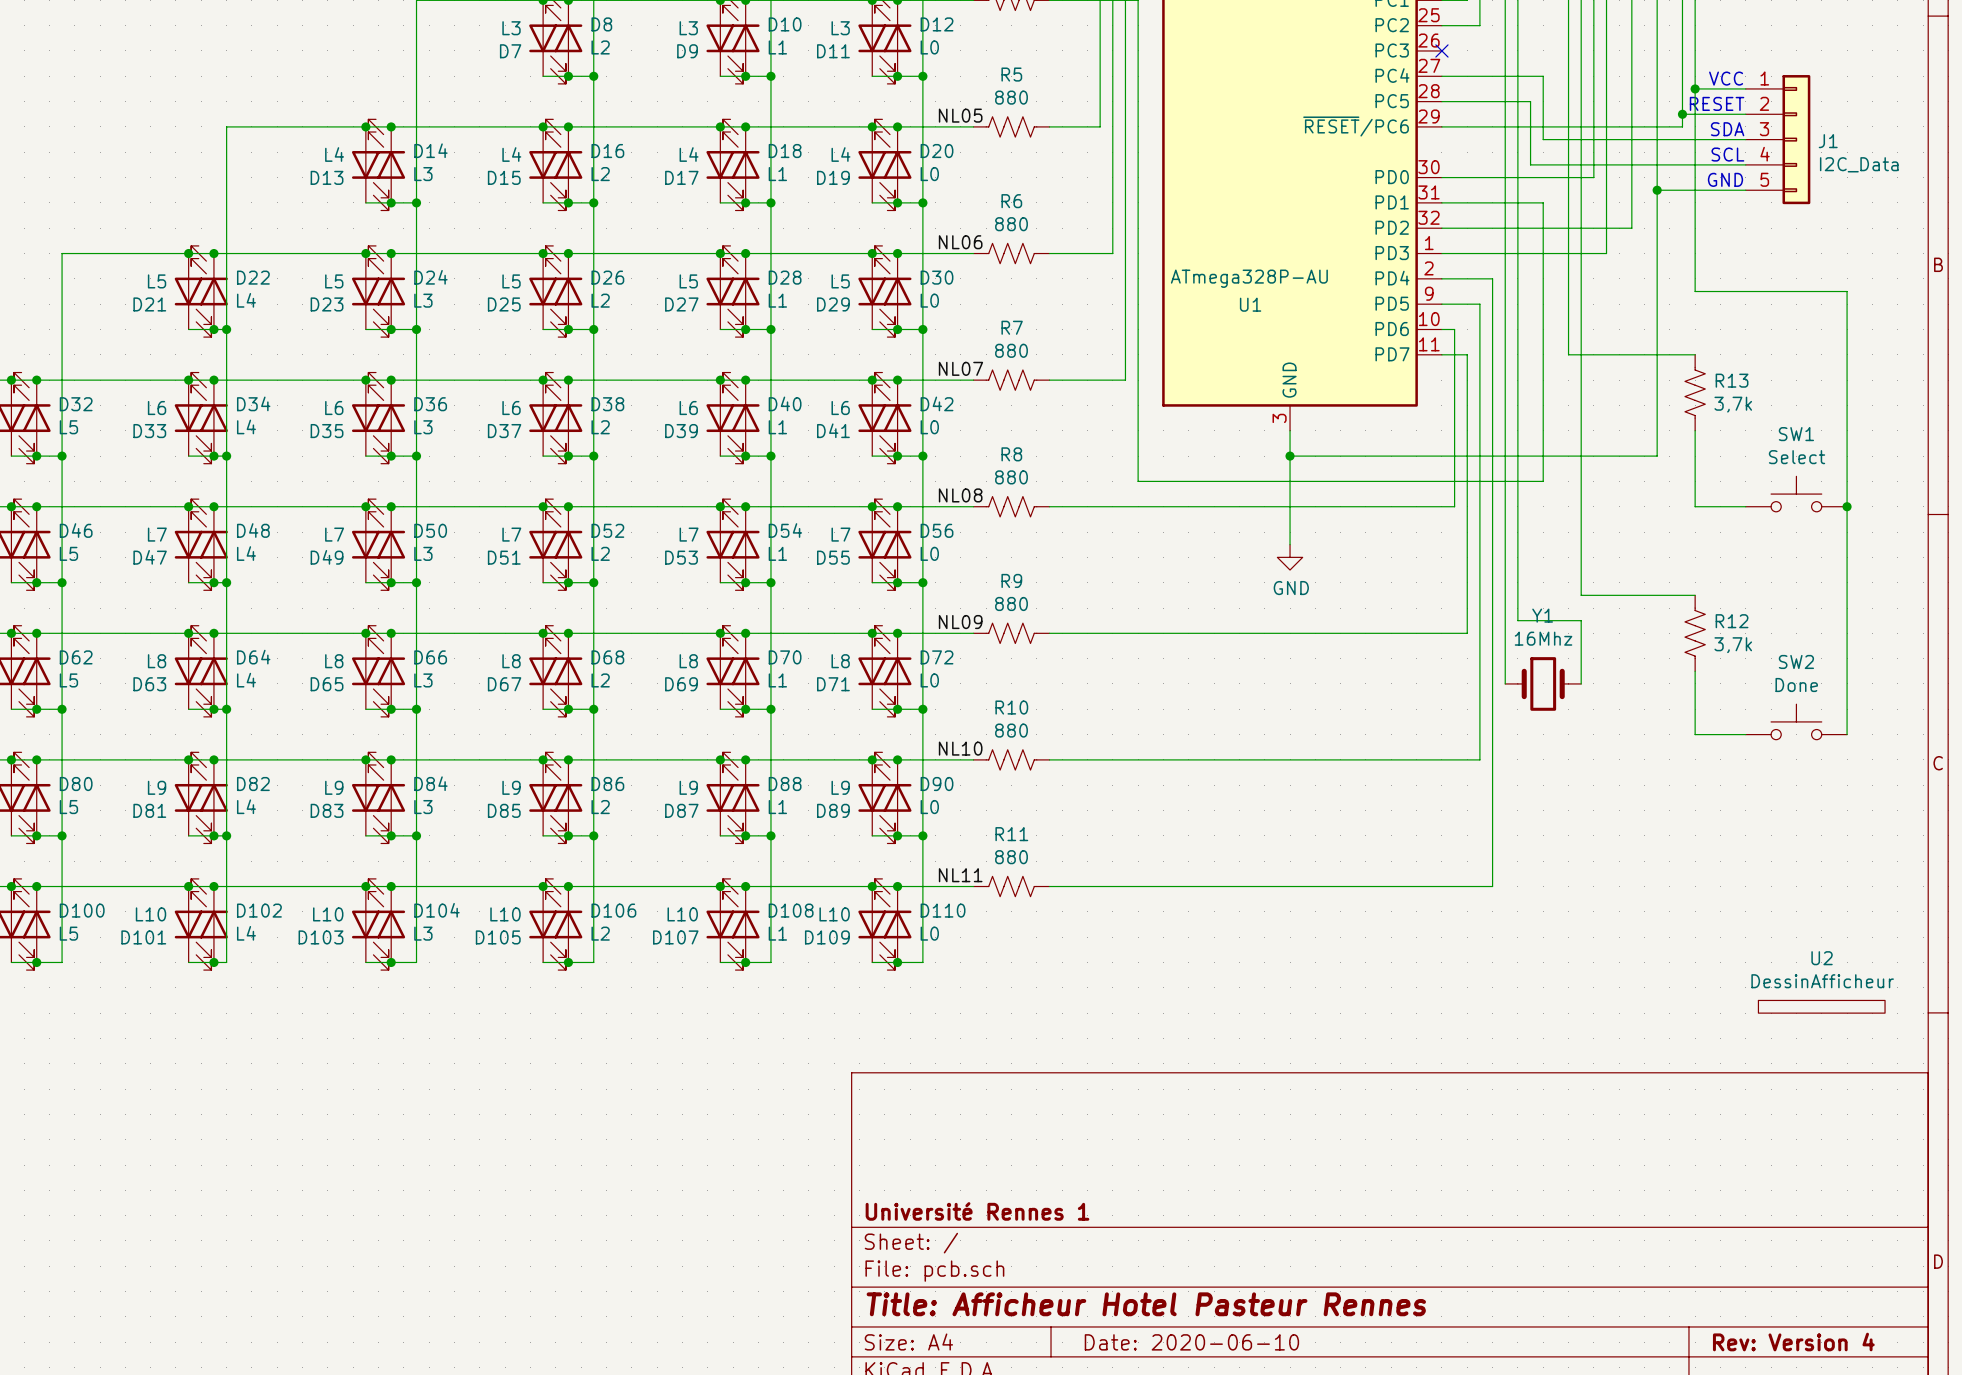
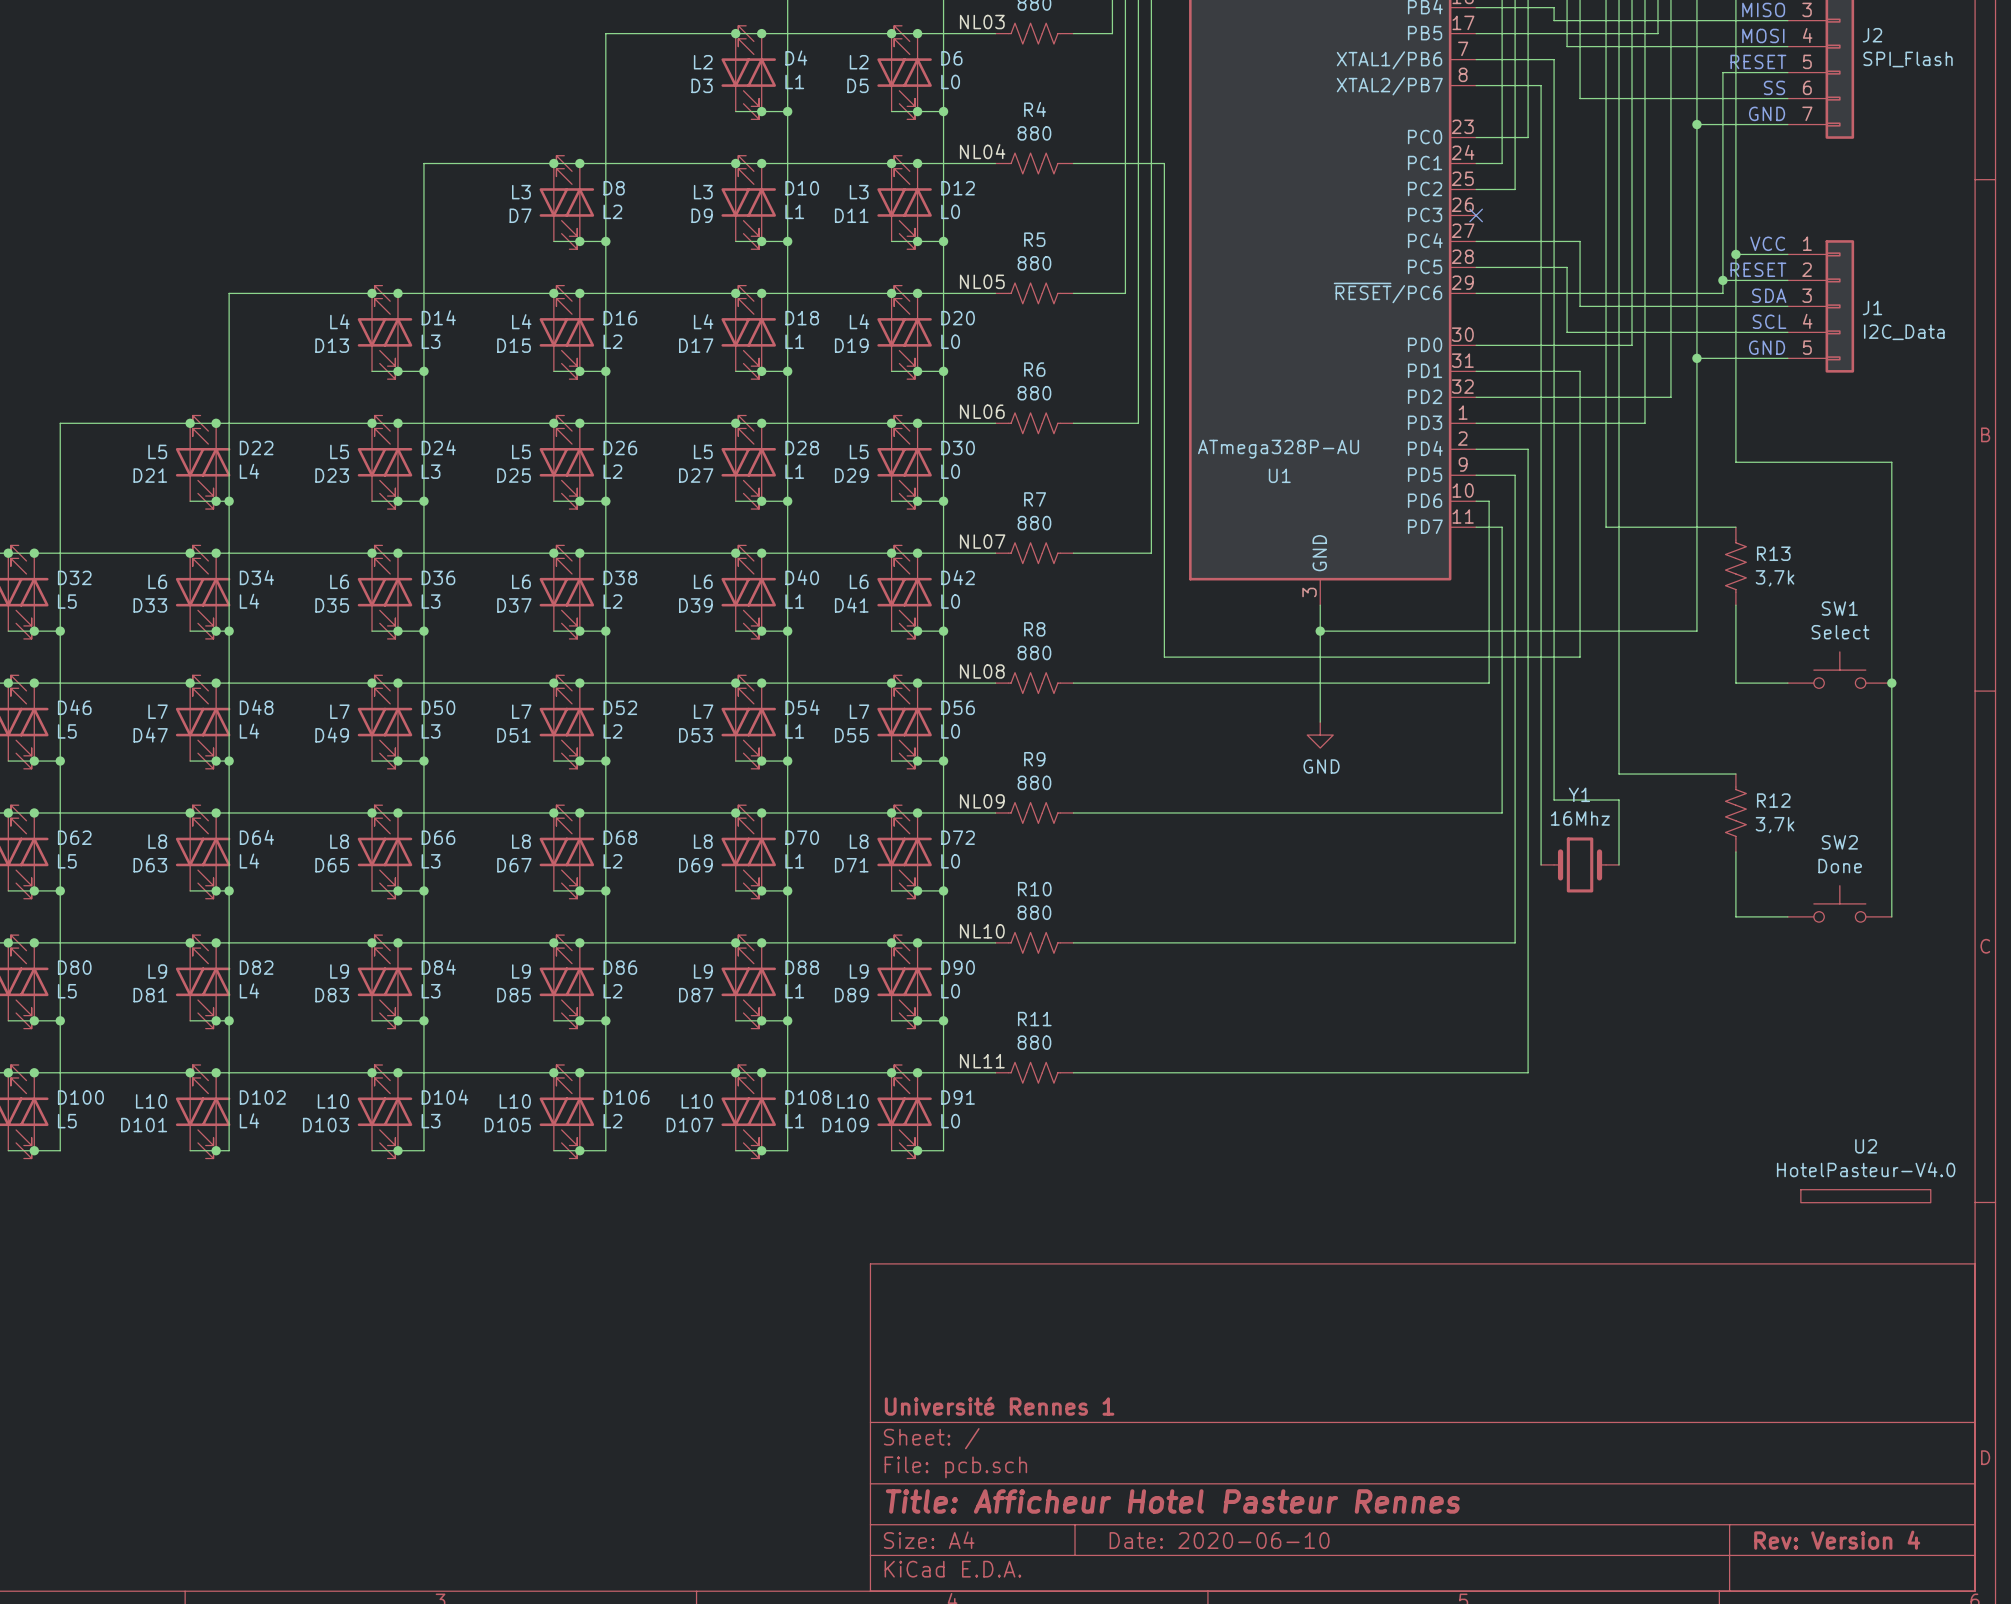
D110 name: D110 (943, 910) -> D91 (958, 1097)
U2 value: DessinAfficheur (1822, 981) -> HotelPasteur-V4.0 (1866, 1169)

